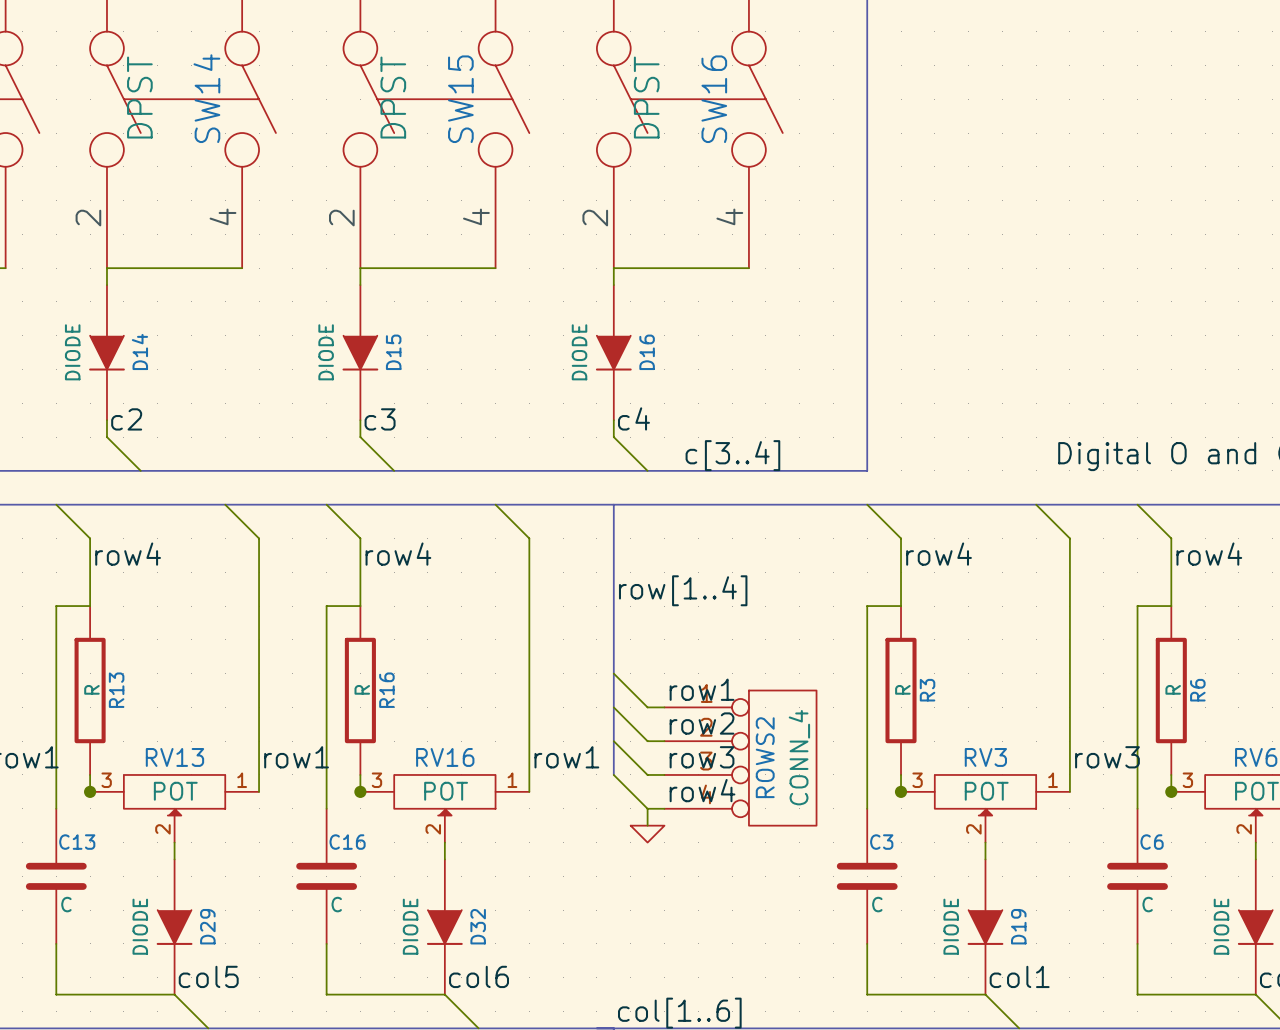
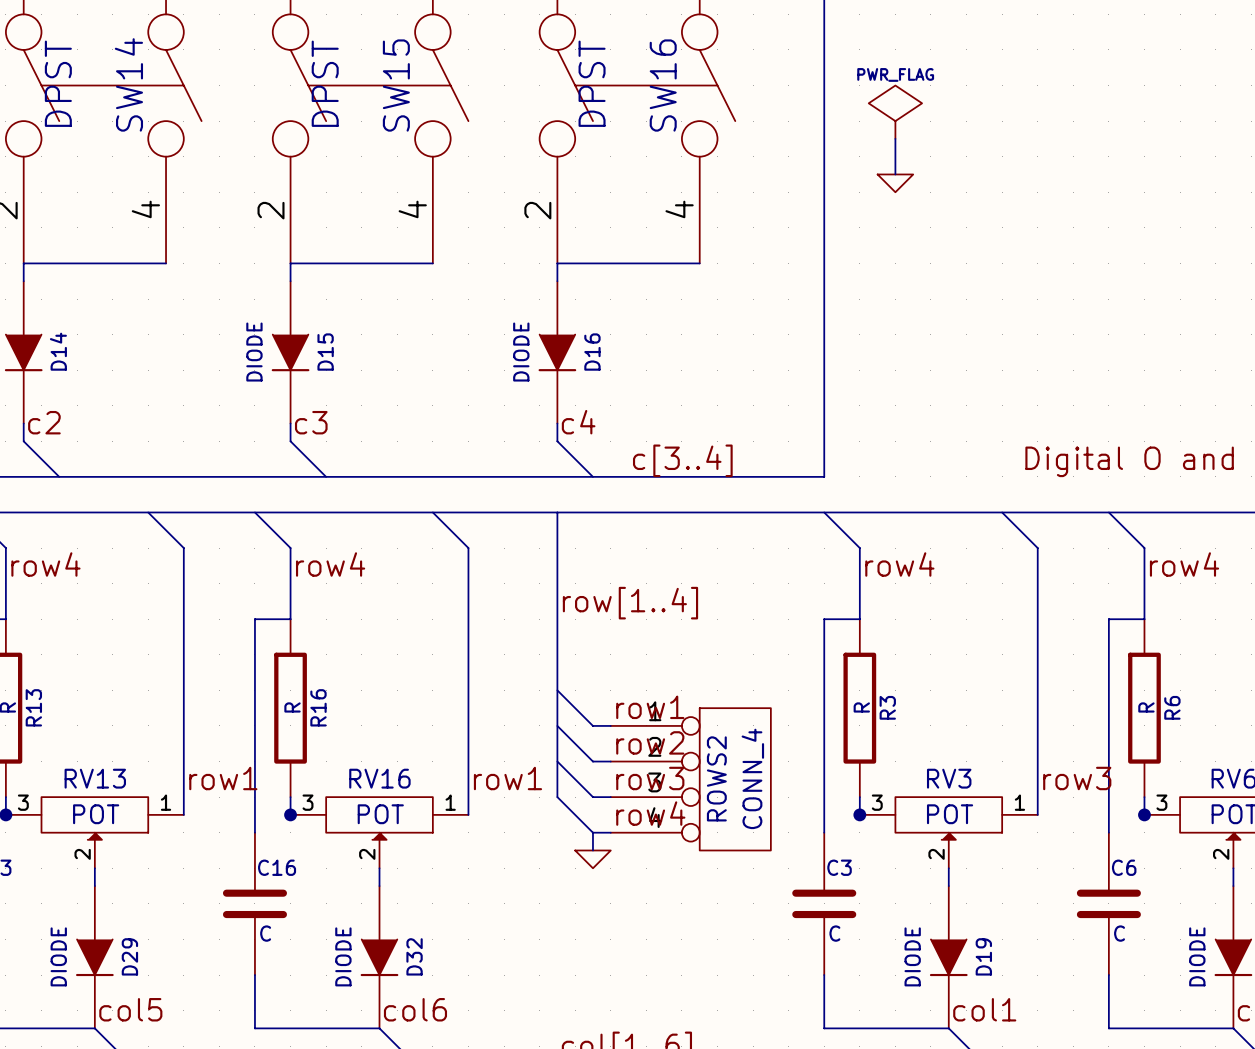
power symbol: none -> PWR_FLAG (895, 112)
wire: none -> (895, 138) (895, 174)
power symbol: none -> (895, 183)

